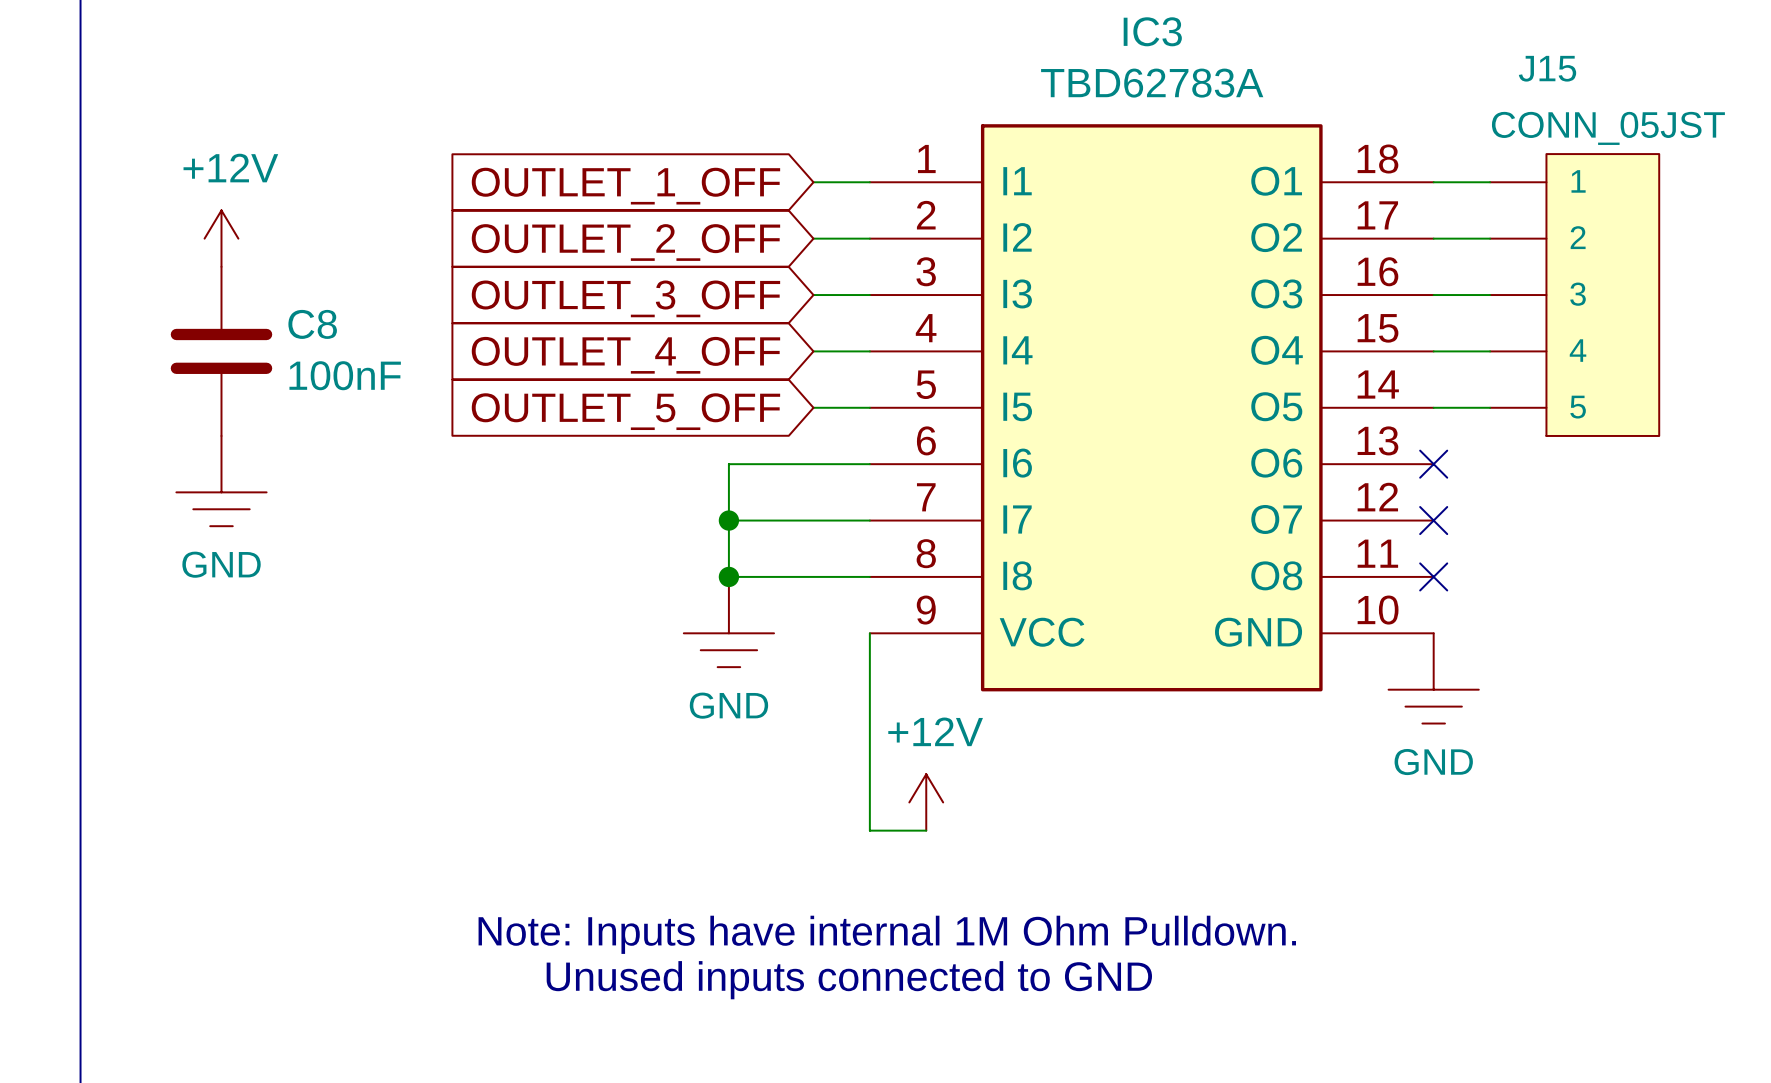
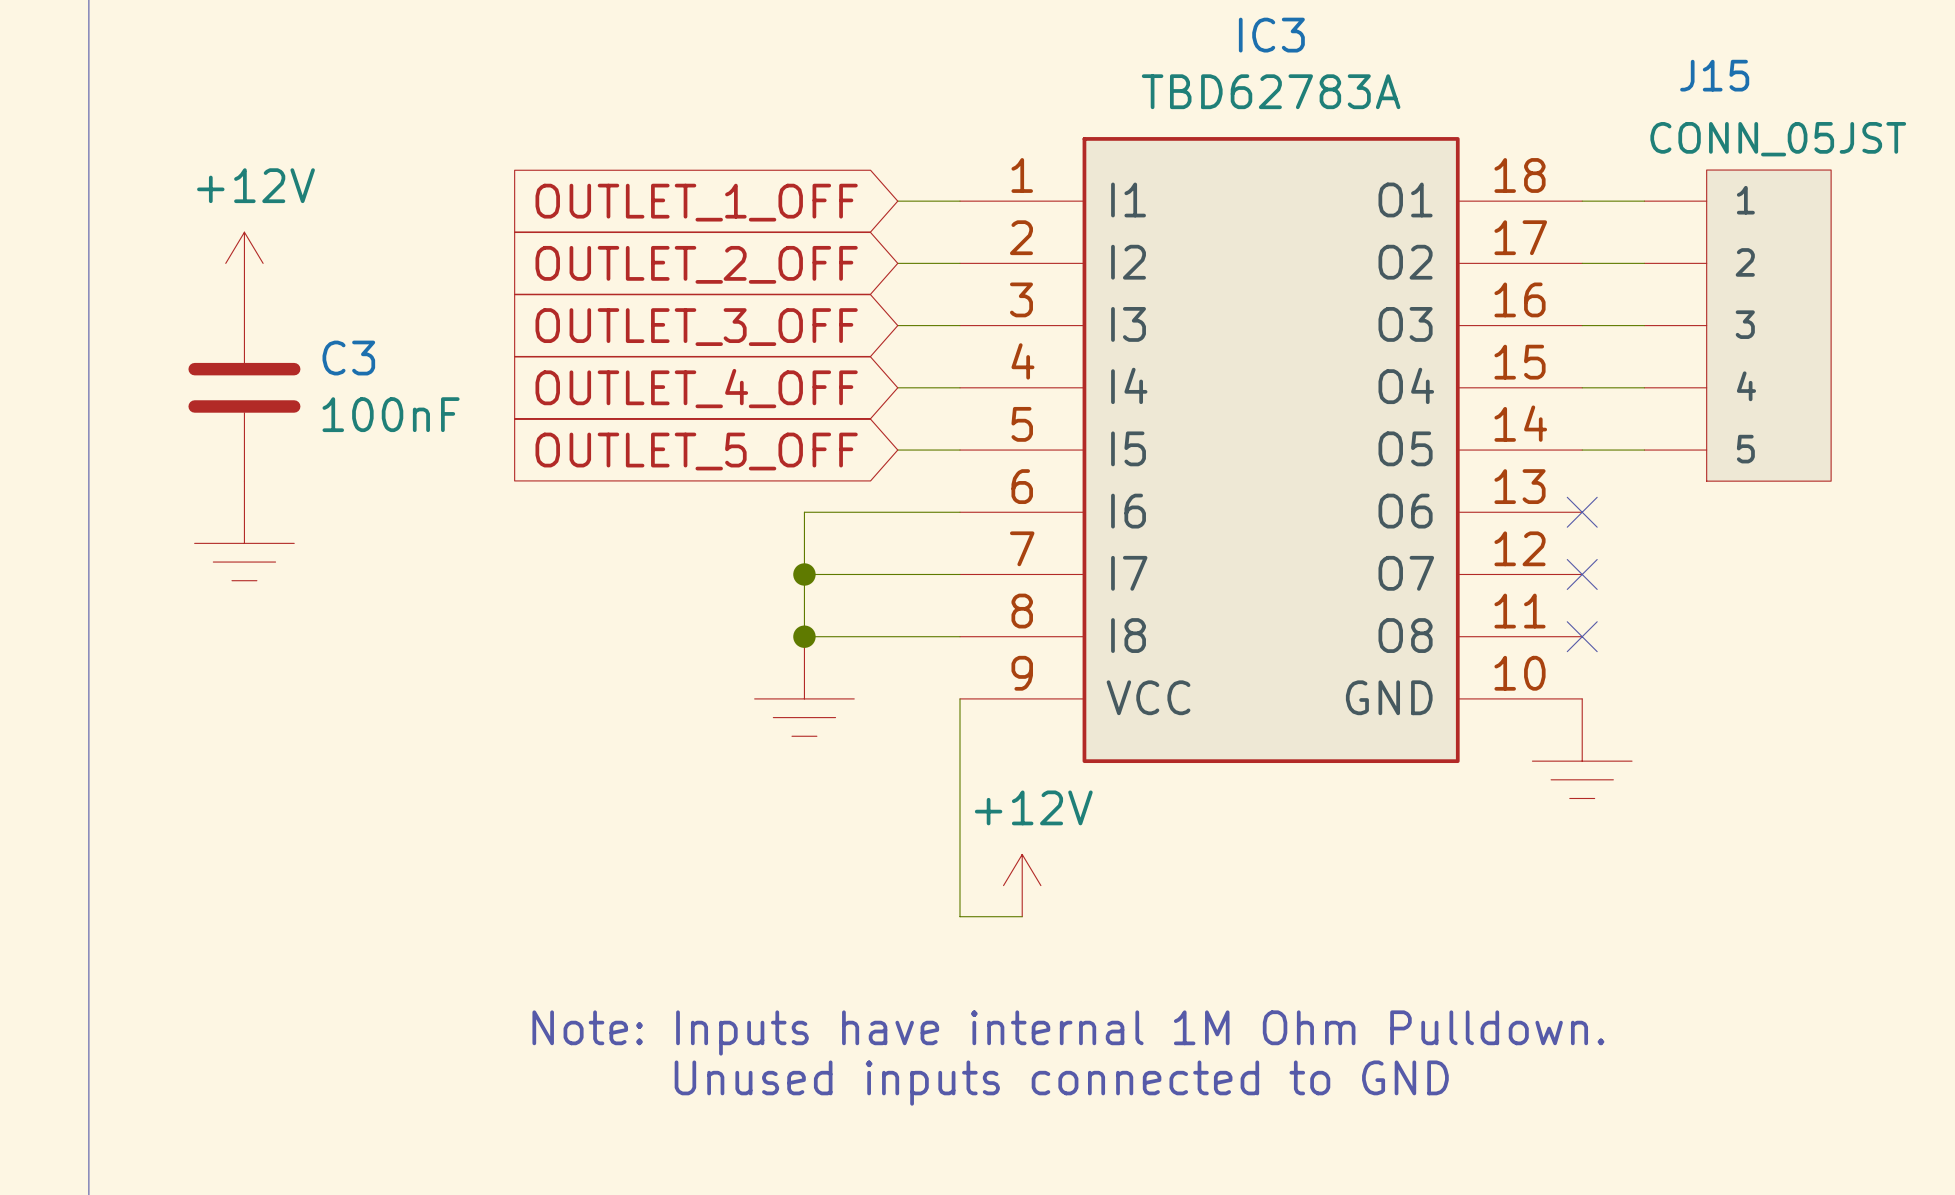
C8 name: C8 (312, 324) -> C3 (348, 358)
power symbol text: GND (221, 564) -> none
power symbol text: GND (728, 705) -> none
power symbol text: GND (1433, 762) -> none

